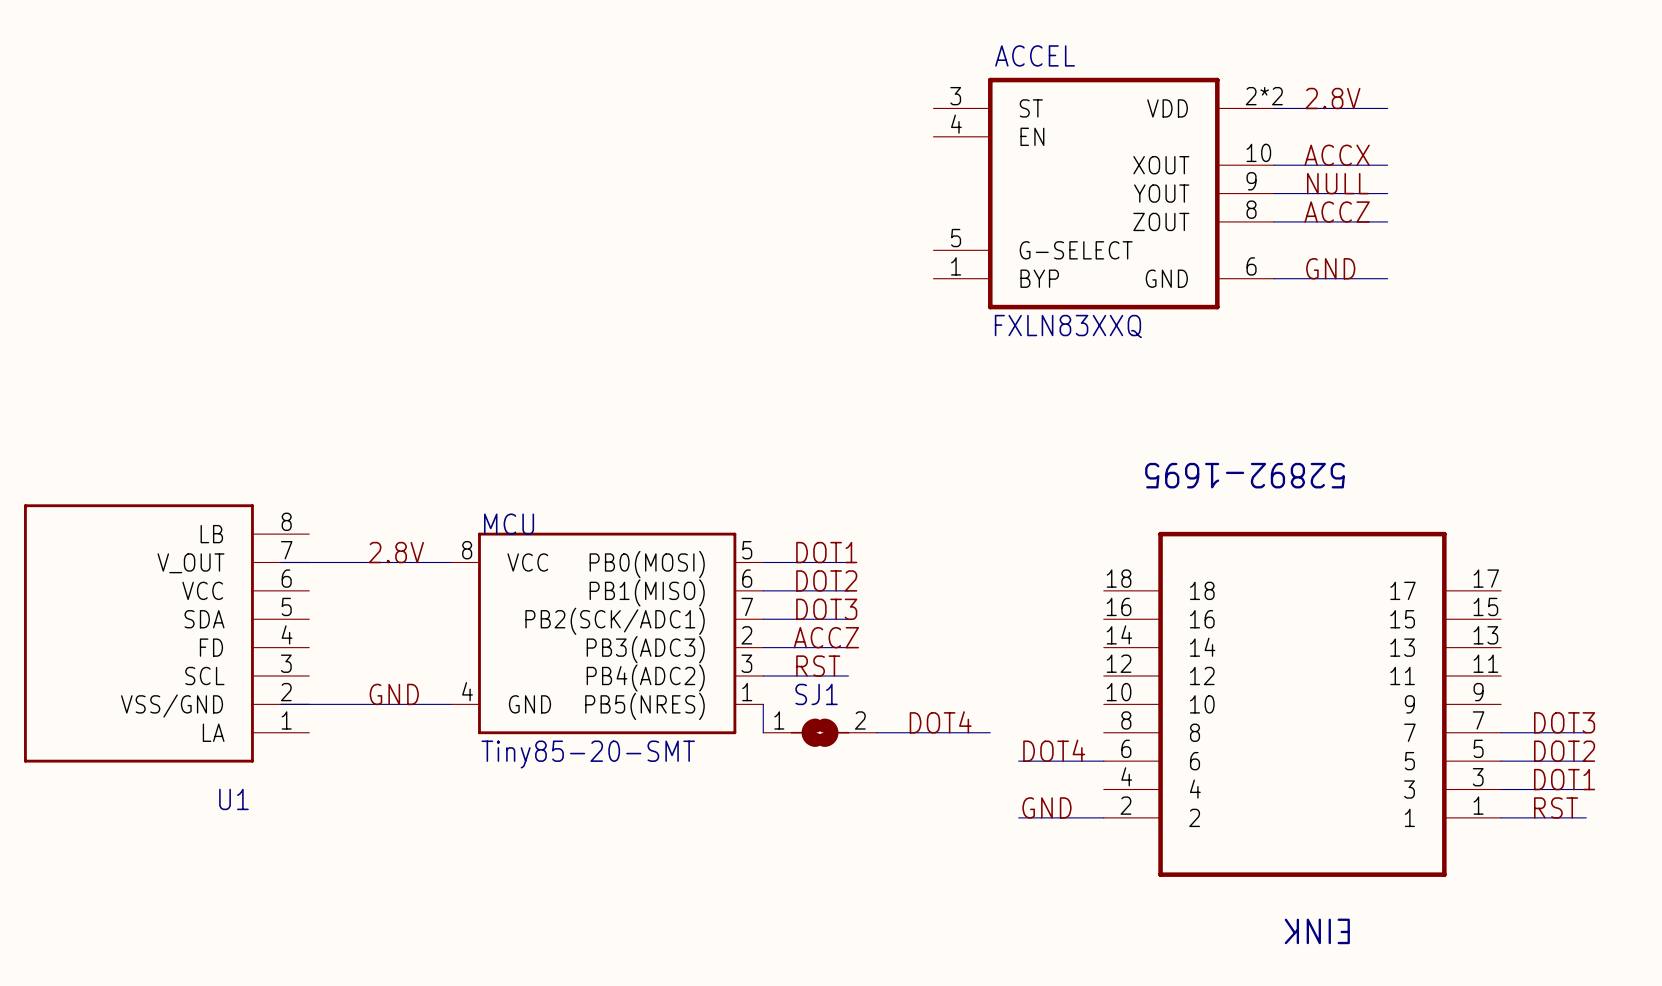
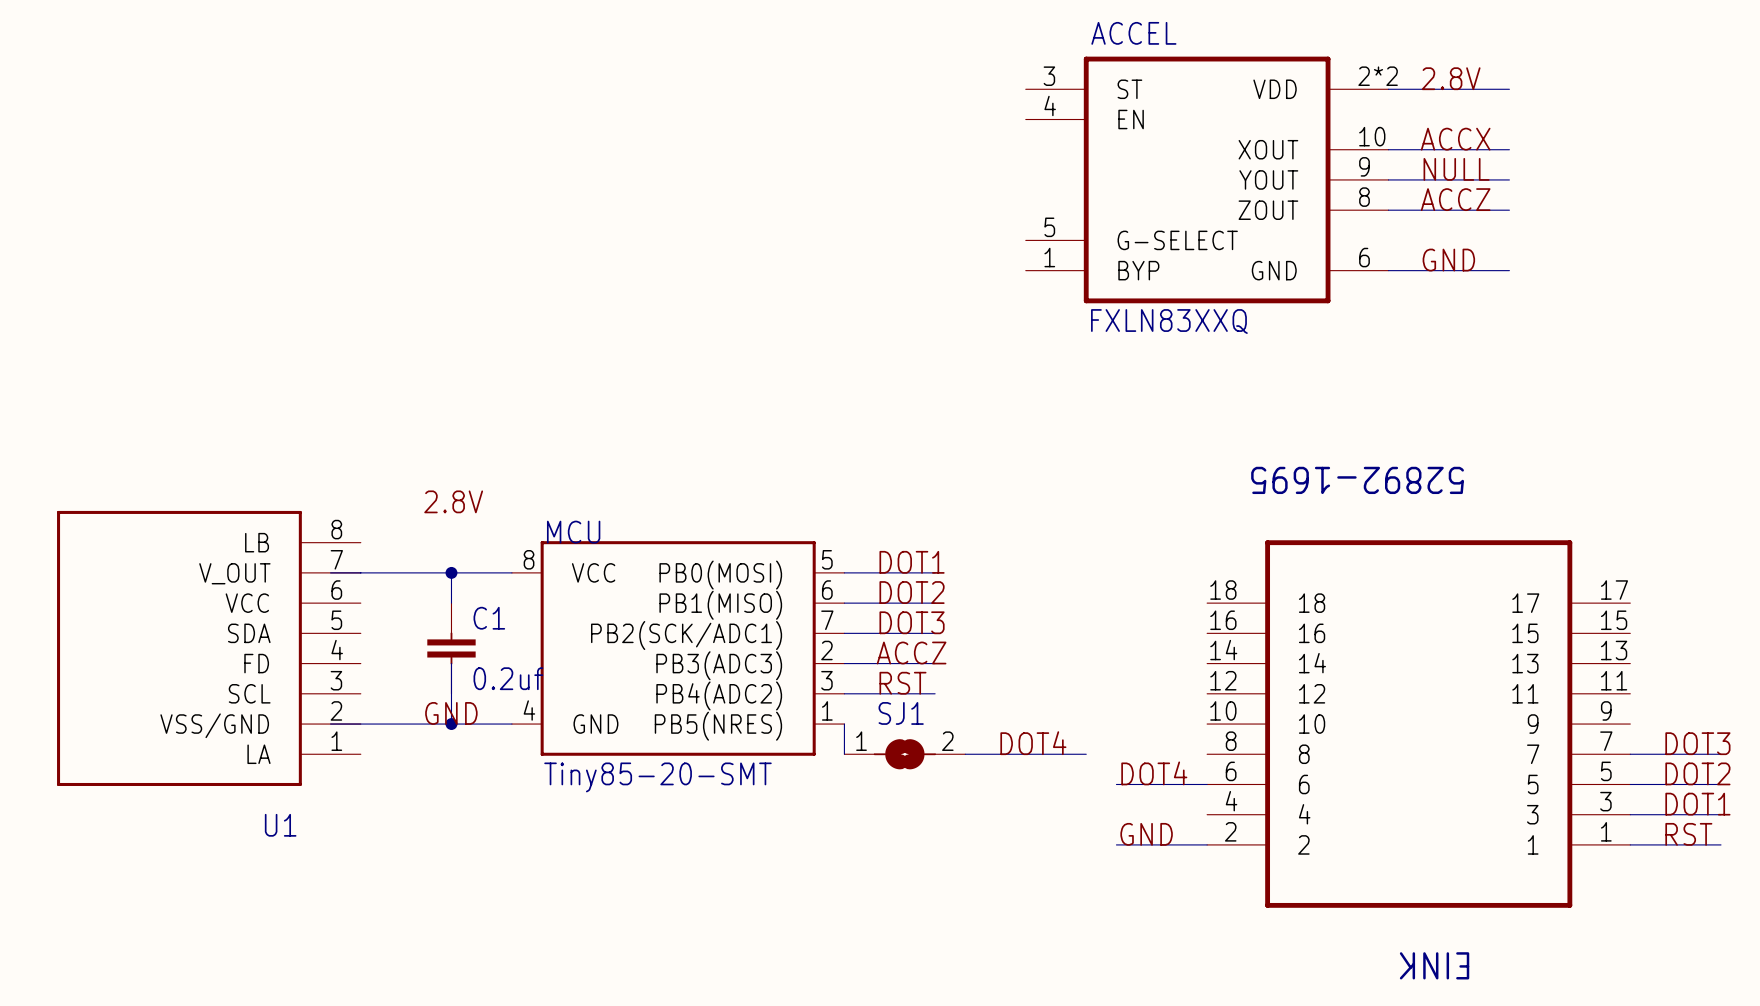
label position: 2.8V (396, 552) -> 2.8V (453, 501)
wire: none -> (451, 572) (451, 603)
junction: none -> (451, 572)
C1: none -> 0.2uf (451, 648)
wire: none -> (451, 663) (451, 724)
junction: none -> (451, 724)

